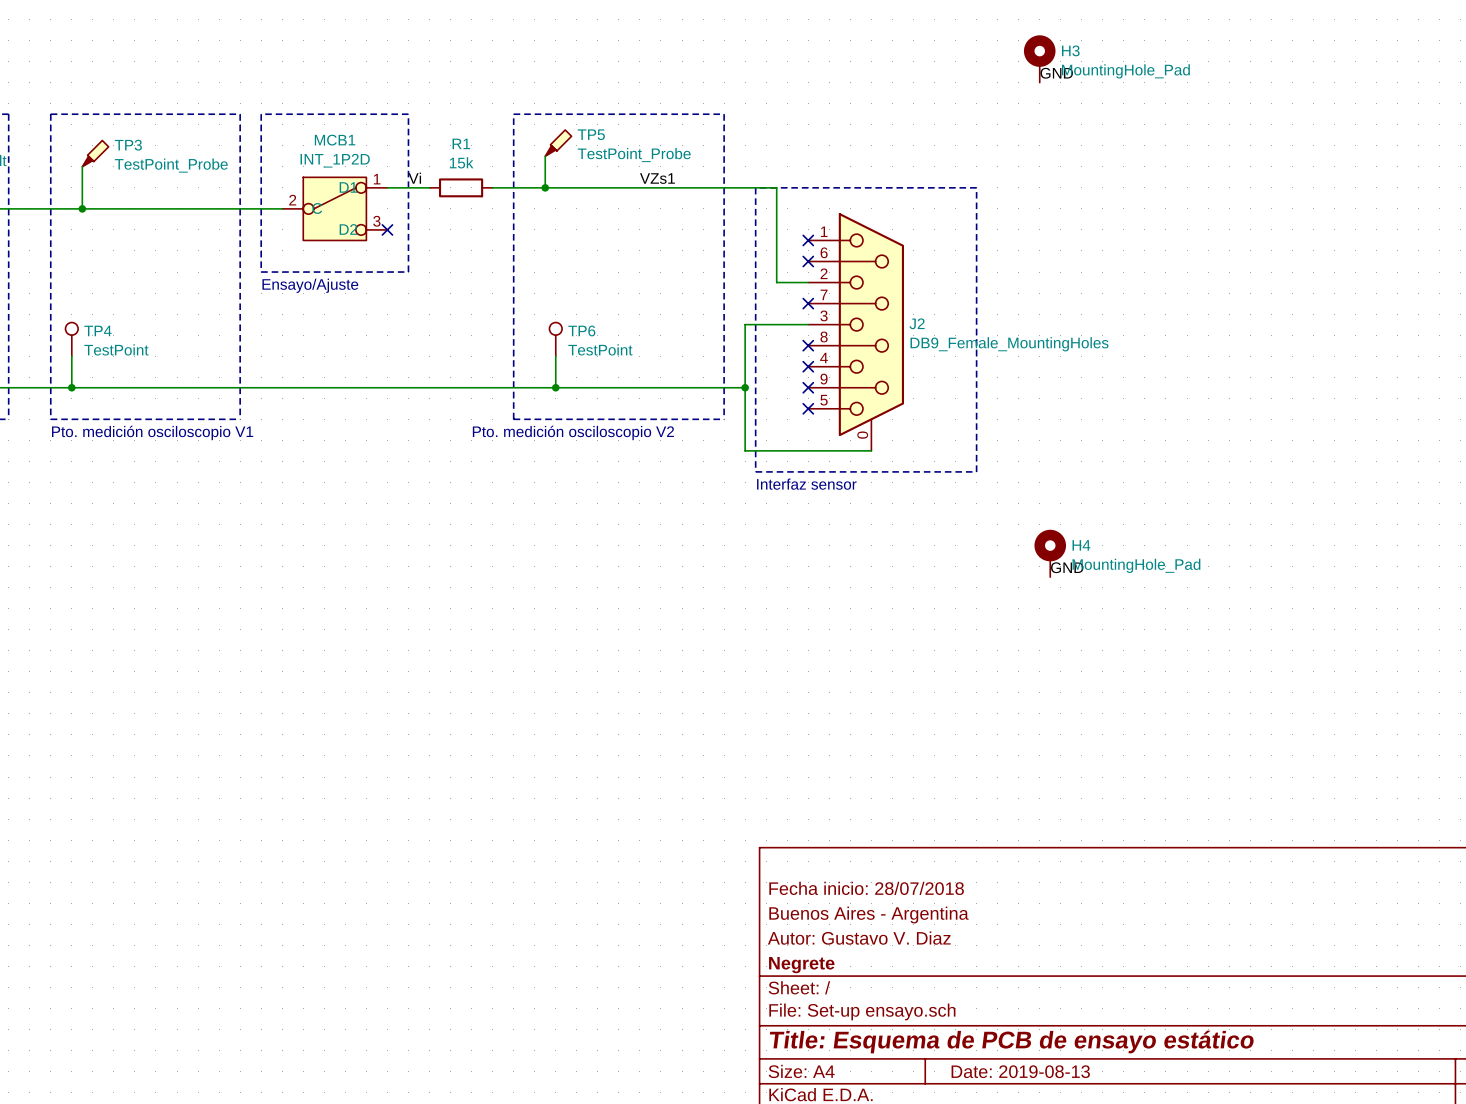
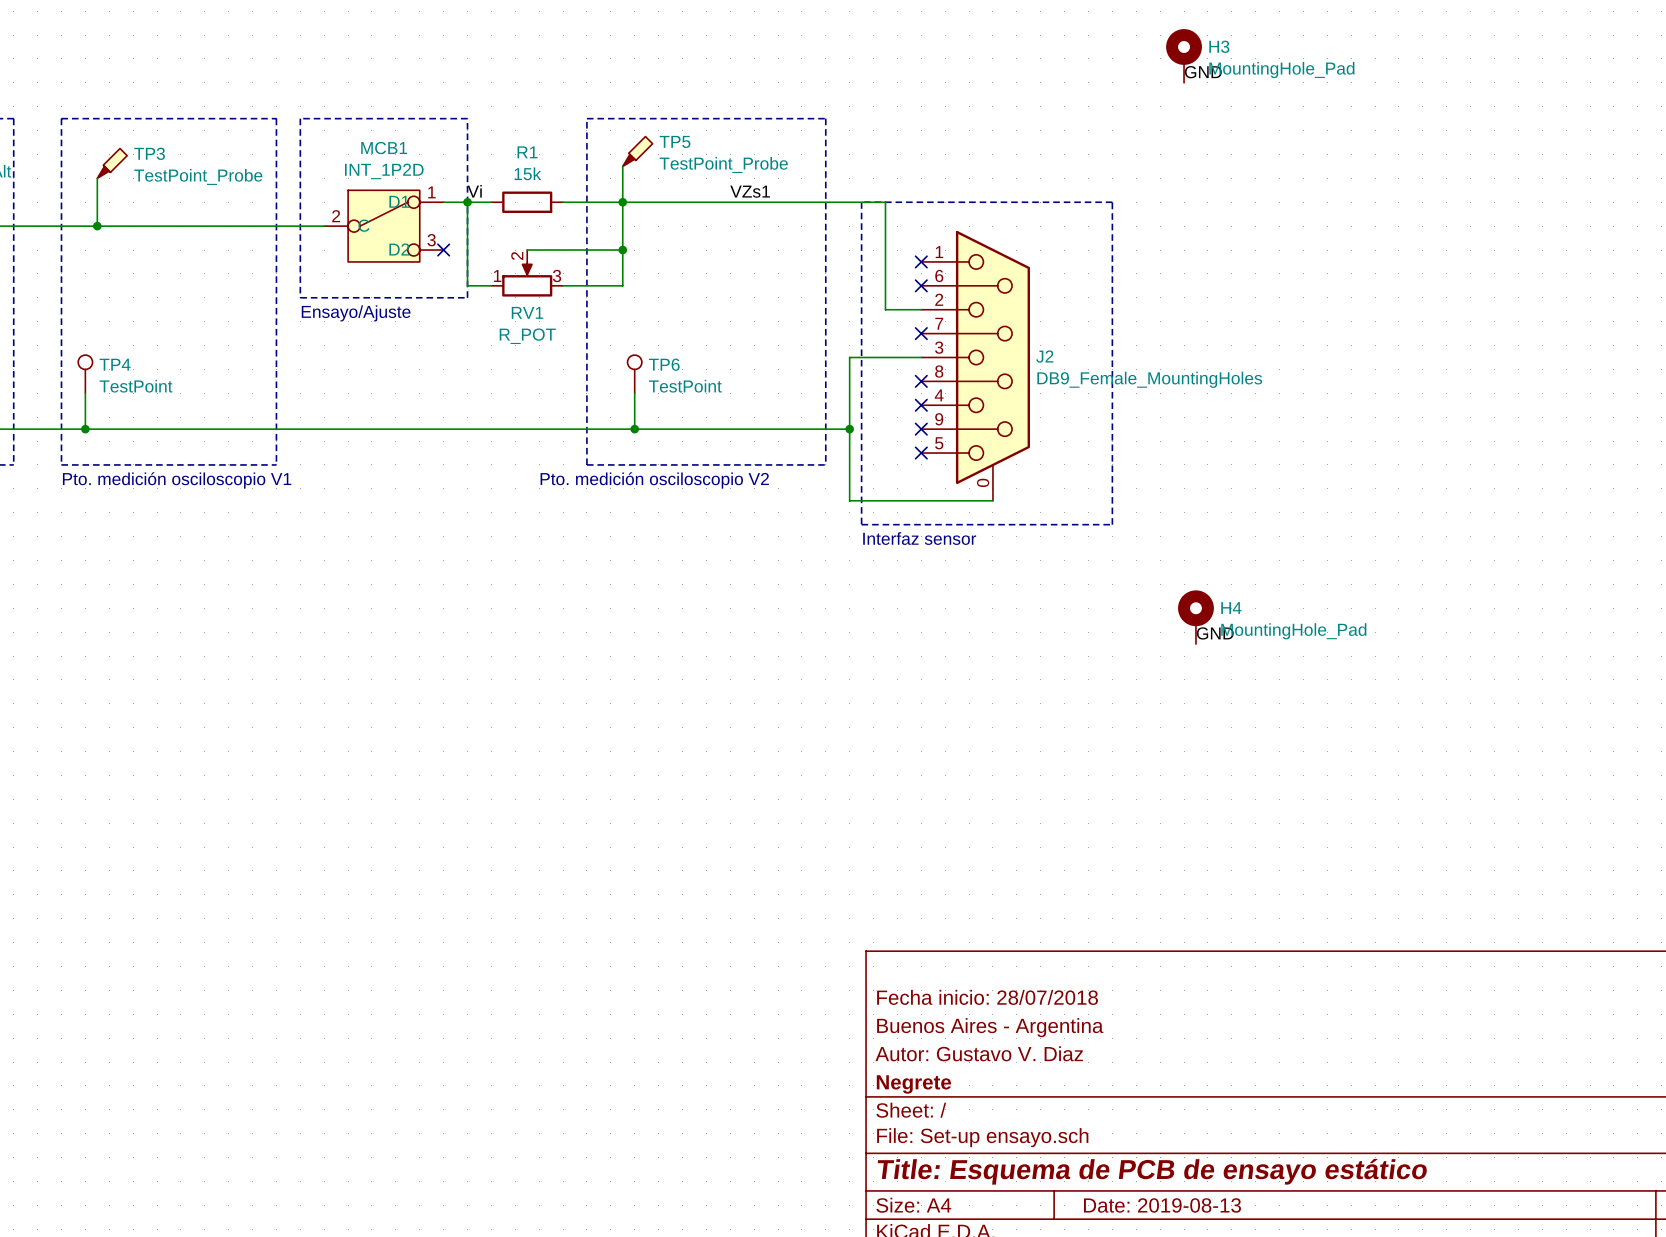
wire: none -> (467, 202) (467, 285) (491, 285)
junction: none -> (467, 202)
wire: none -> (622, 202) (622, 285) (563, 285)
wire: none -> (527, 250) (622, 250)
junction: none -> (622, 250)
RV1: none -> R_POT (527, 273)

